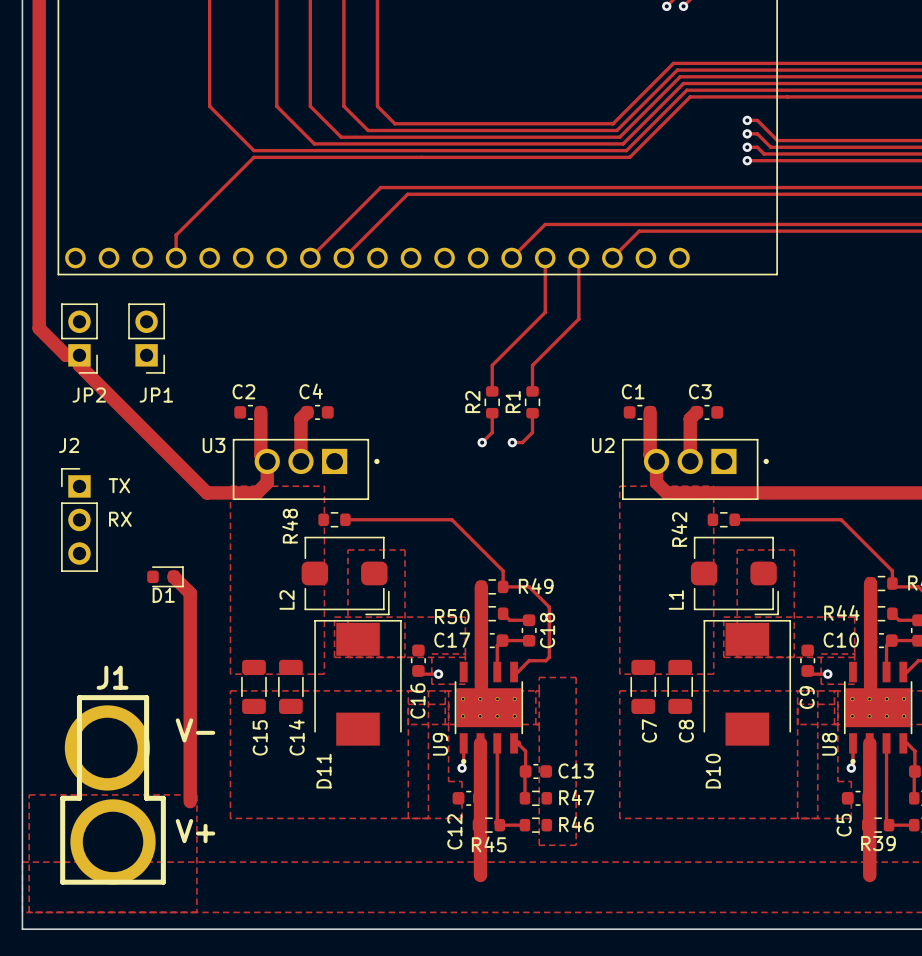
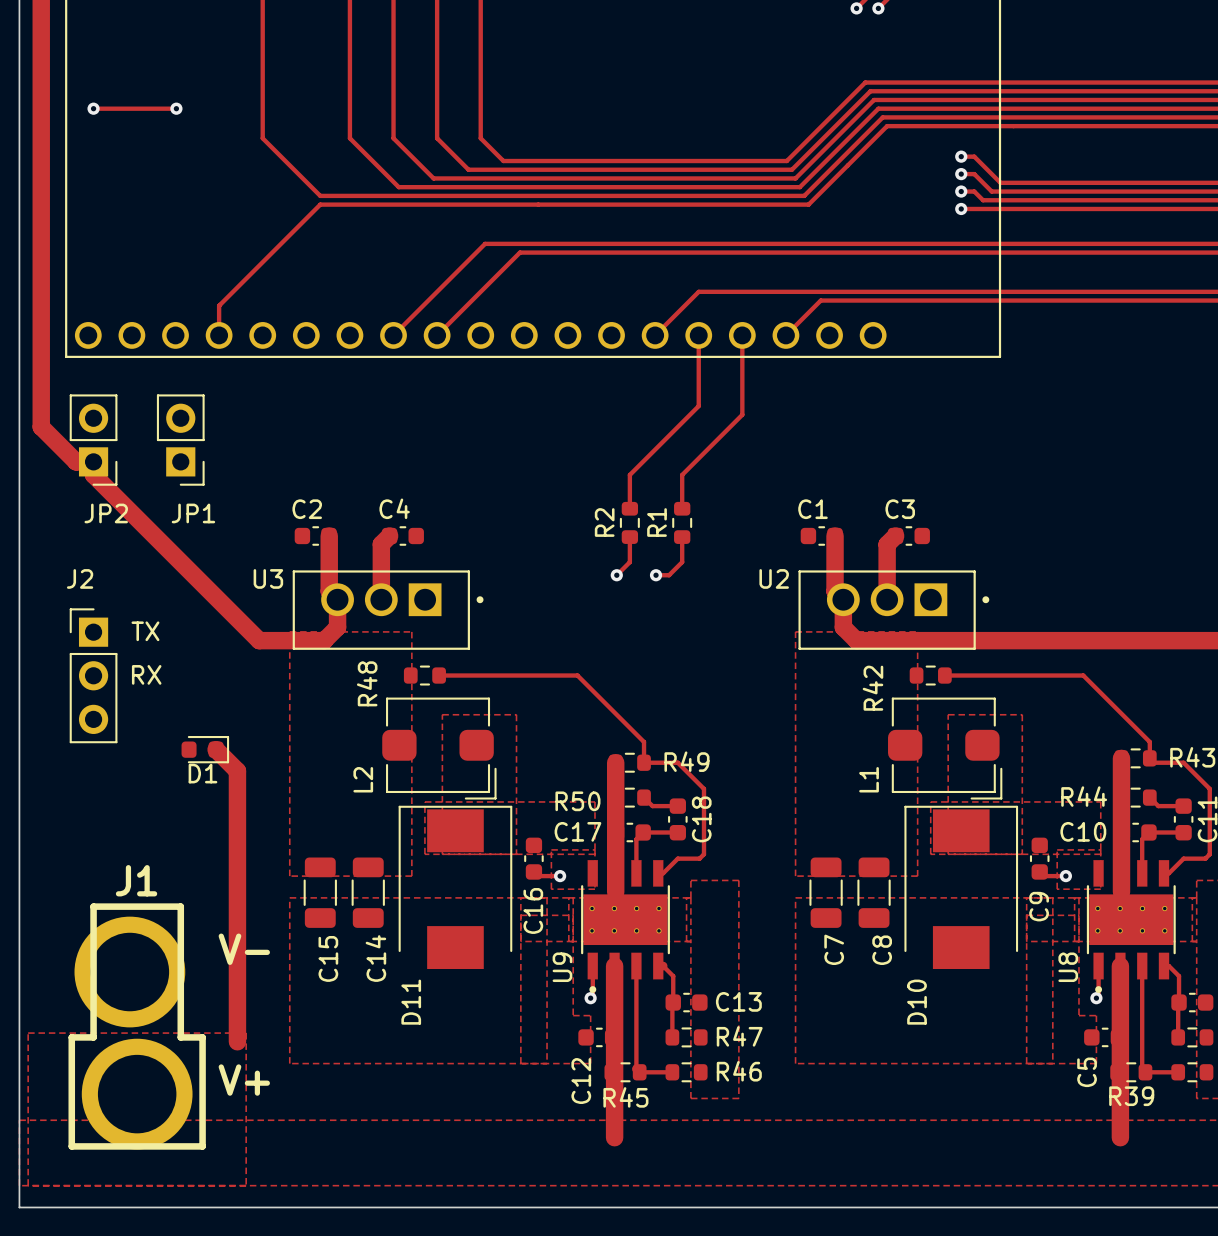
track: none -> (93, 108) (176, 108)
via: none -> (93, 108)
via: none -> (176, 108)

